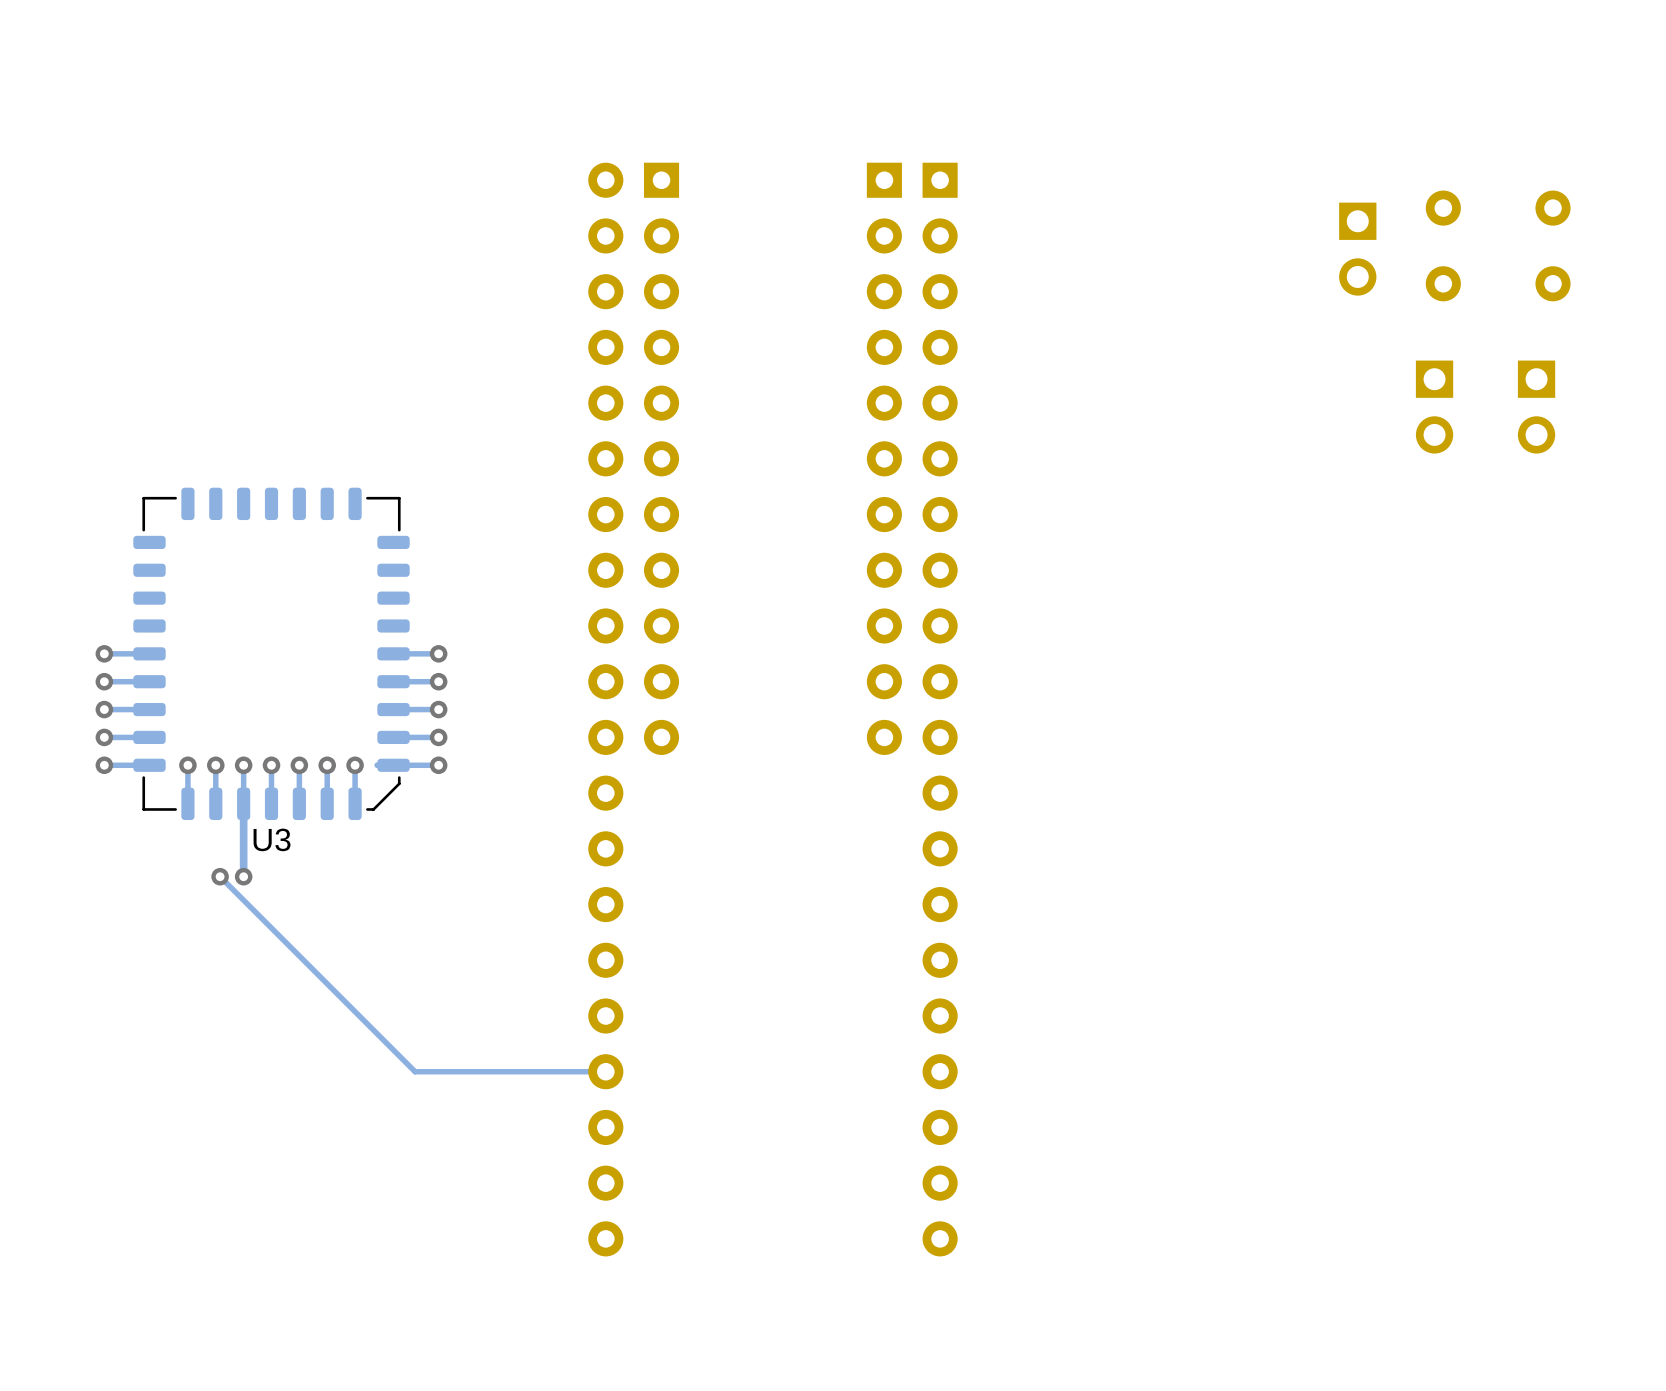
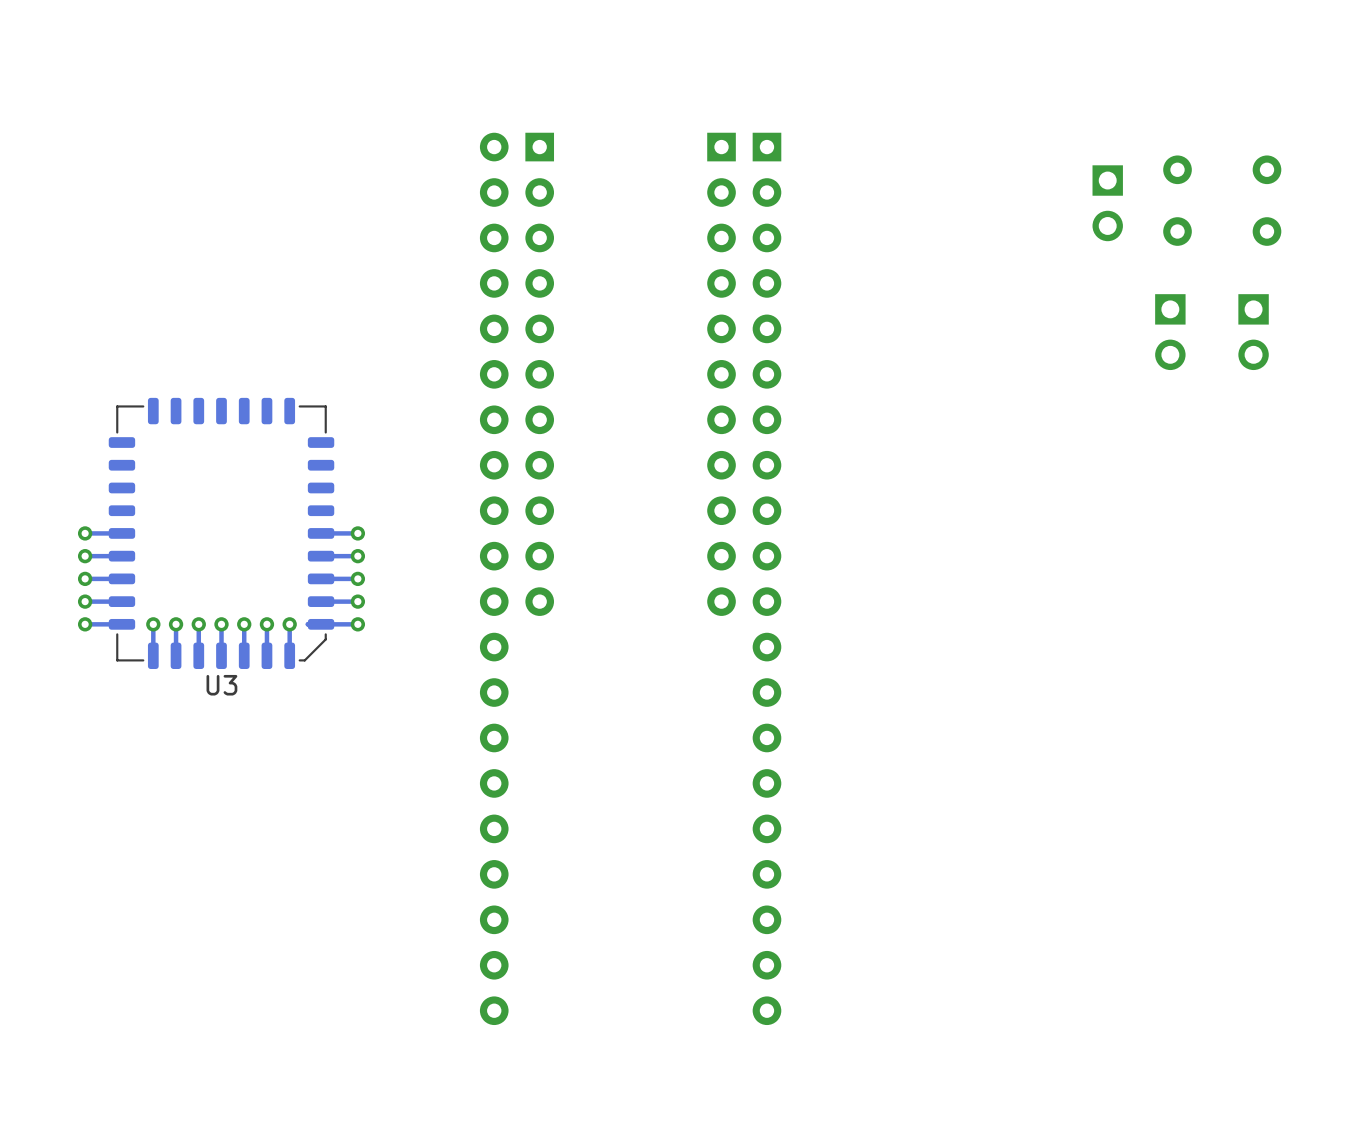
track: (243, 803) (243, 876) -> none
track: (220, 876) (415, 1071) (605, 1071) -> none
via: (220, 876) -> none
via: (243, 876) -> none

